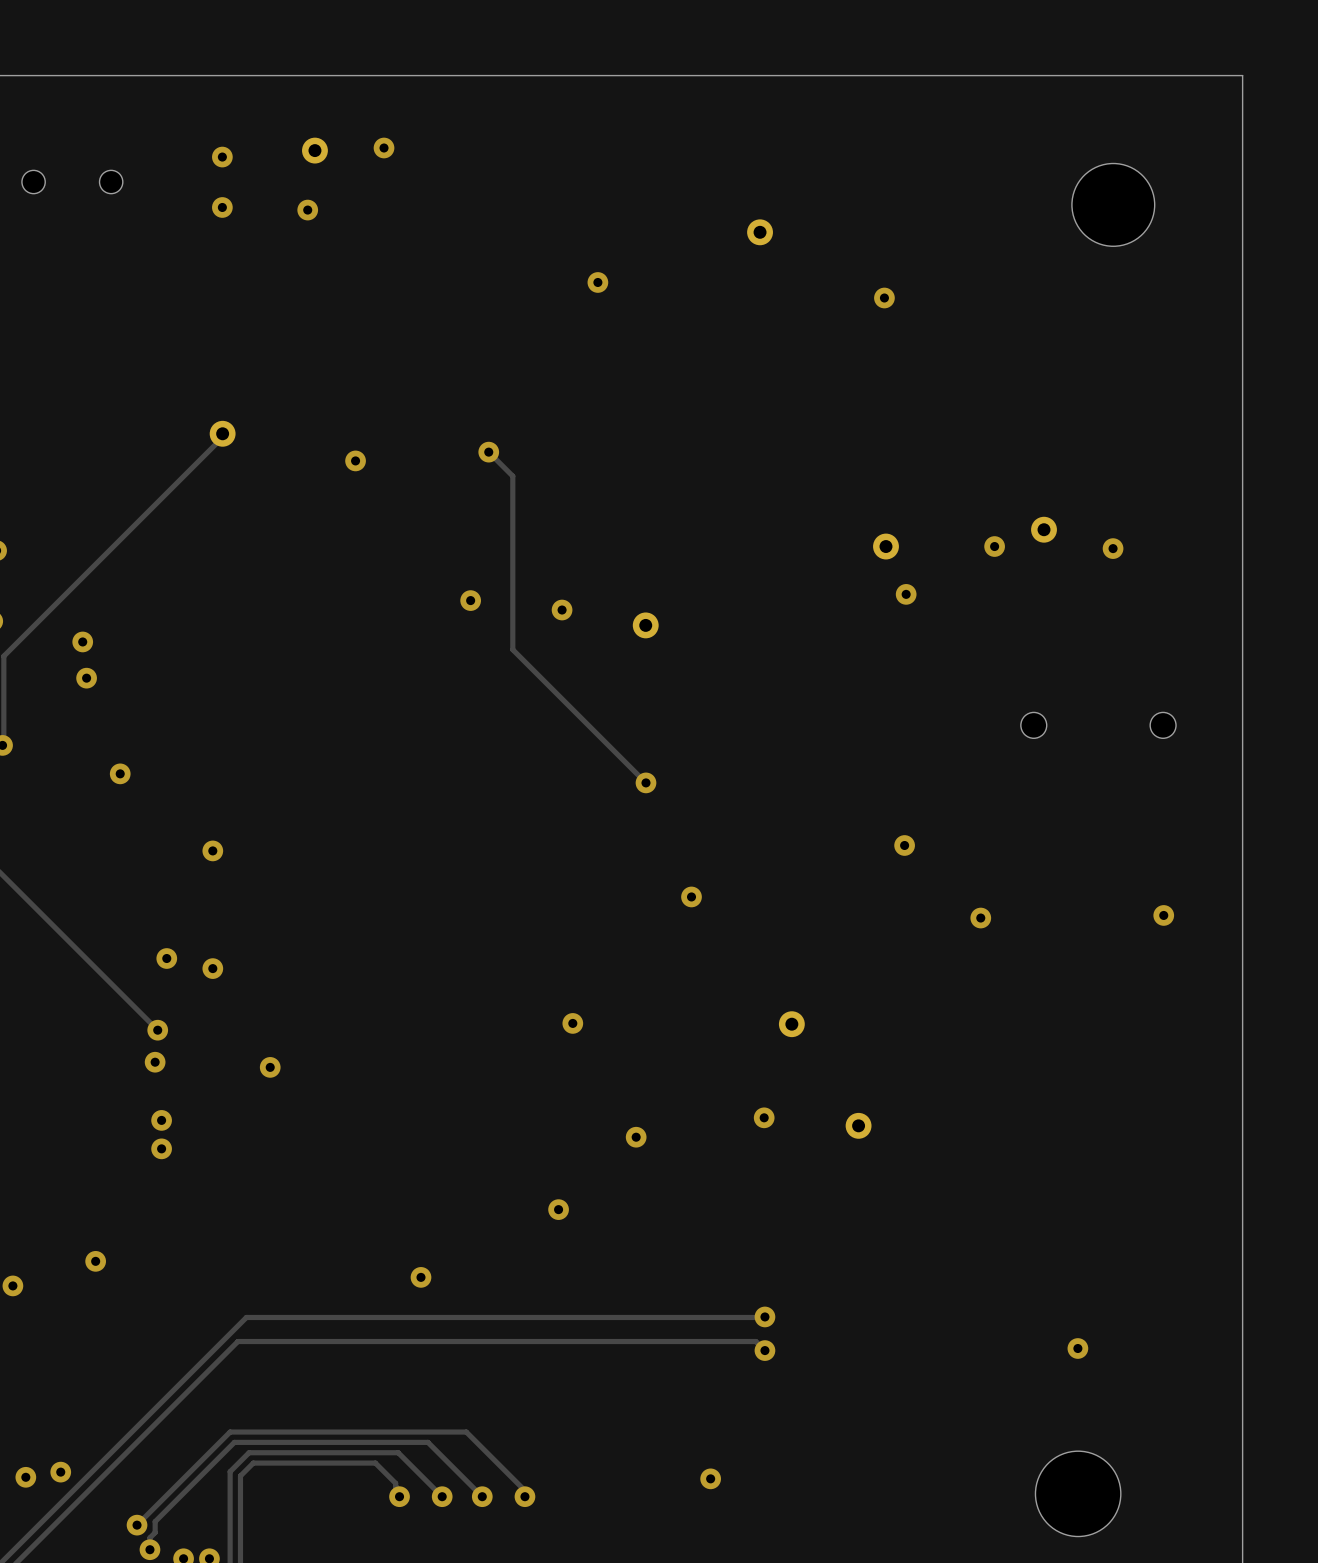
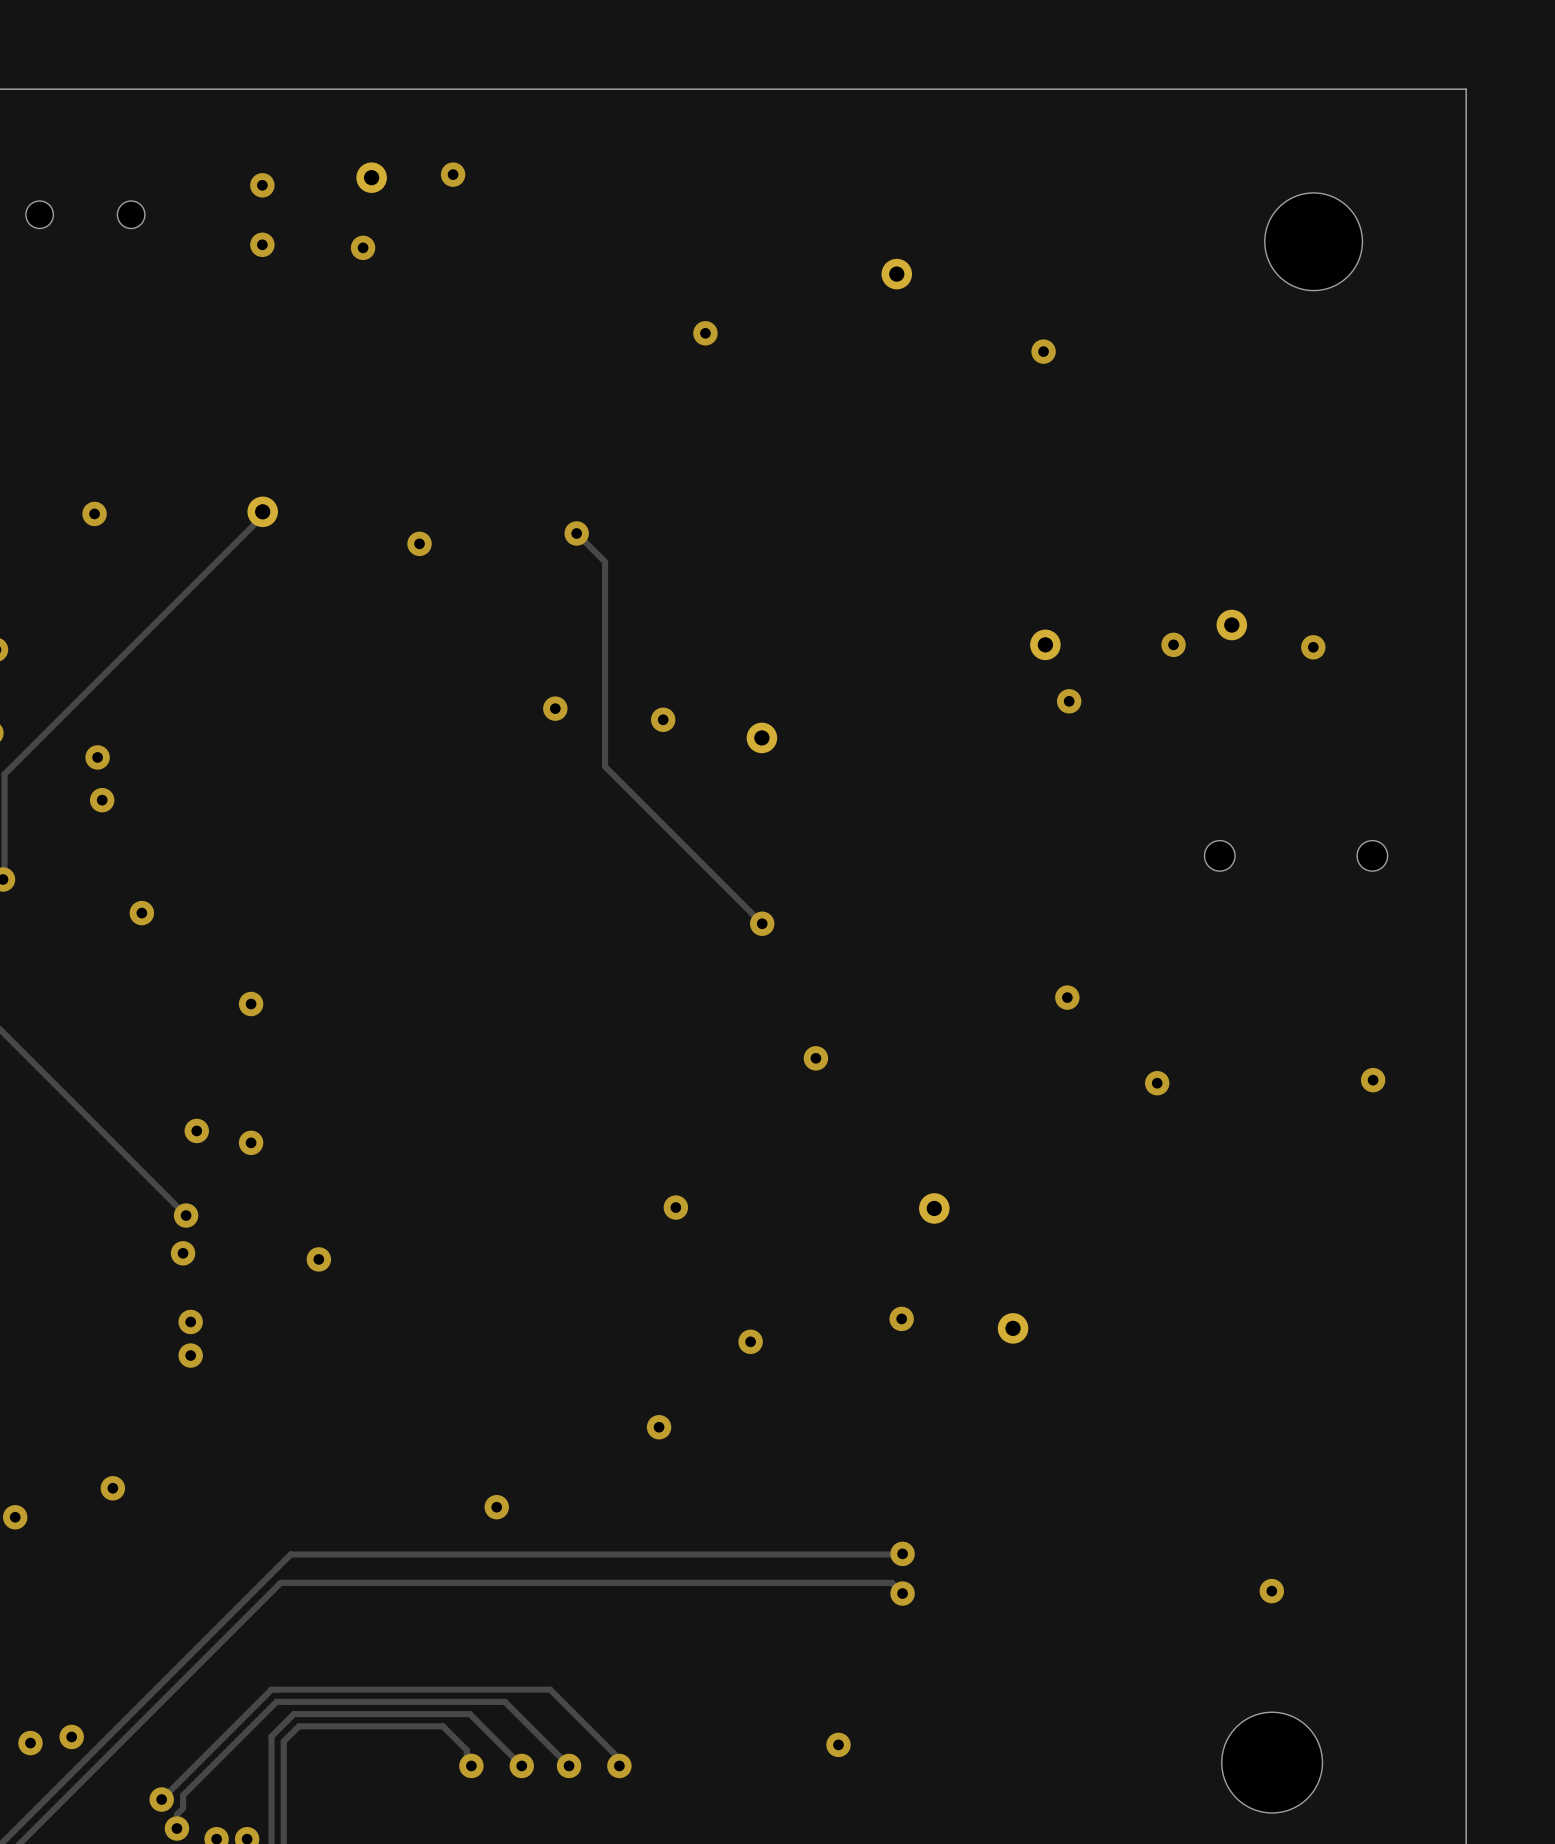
via: none -> (94, 513)

